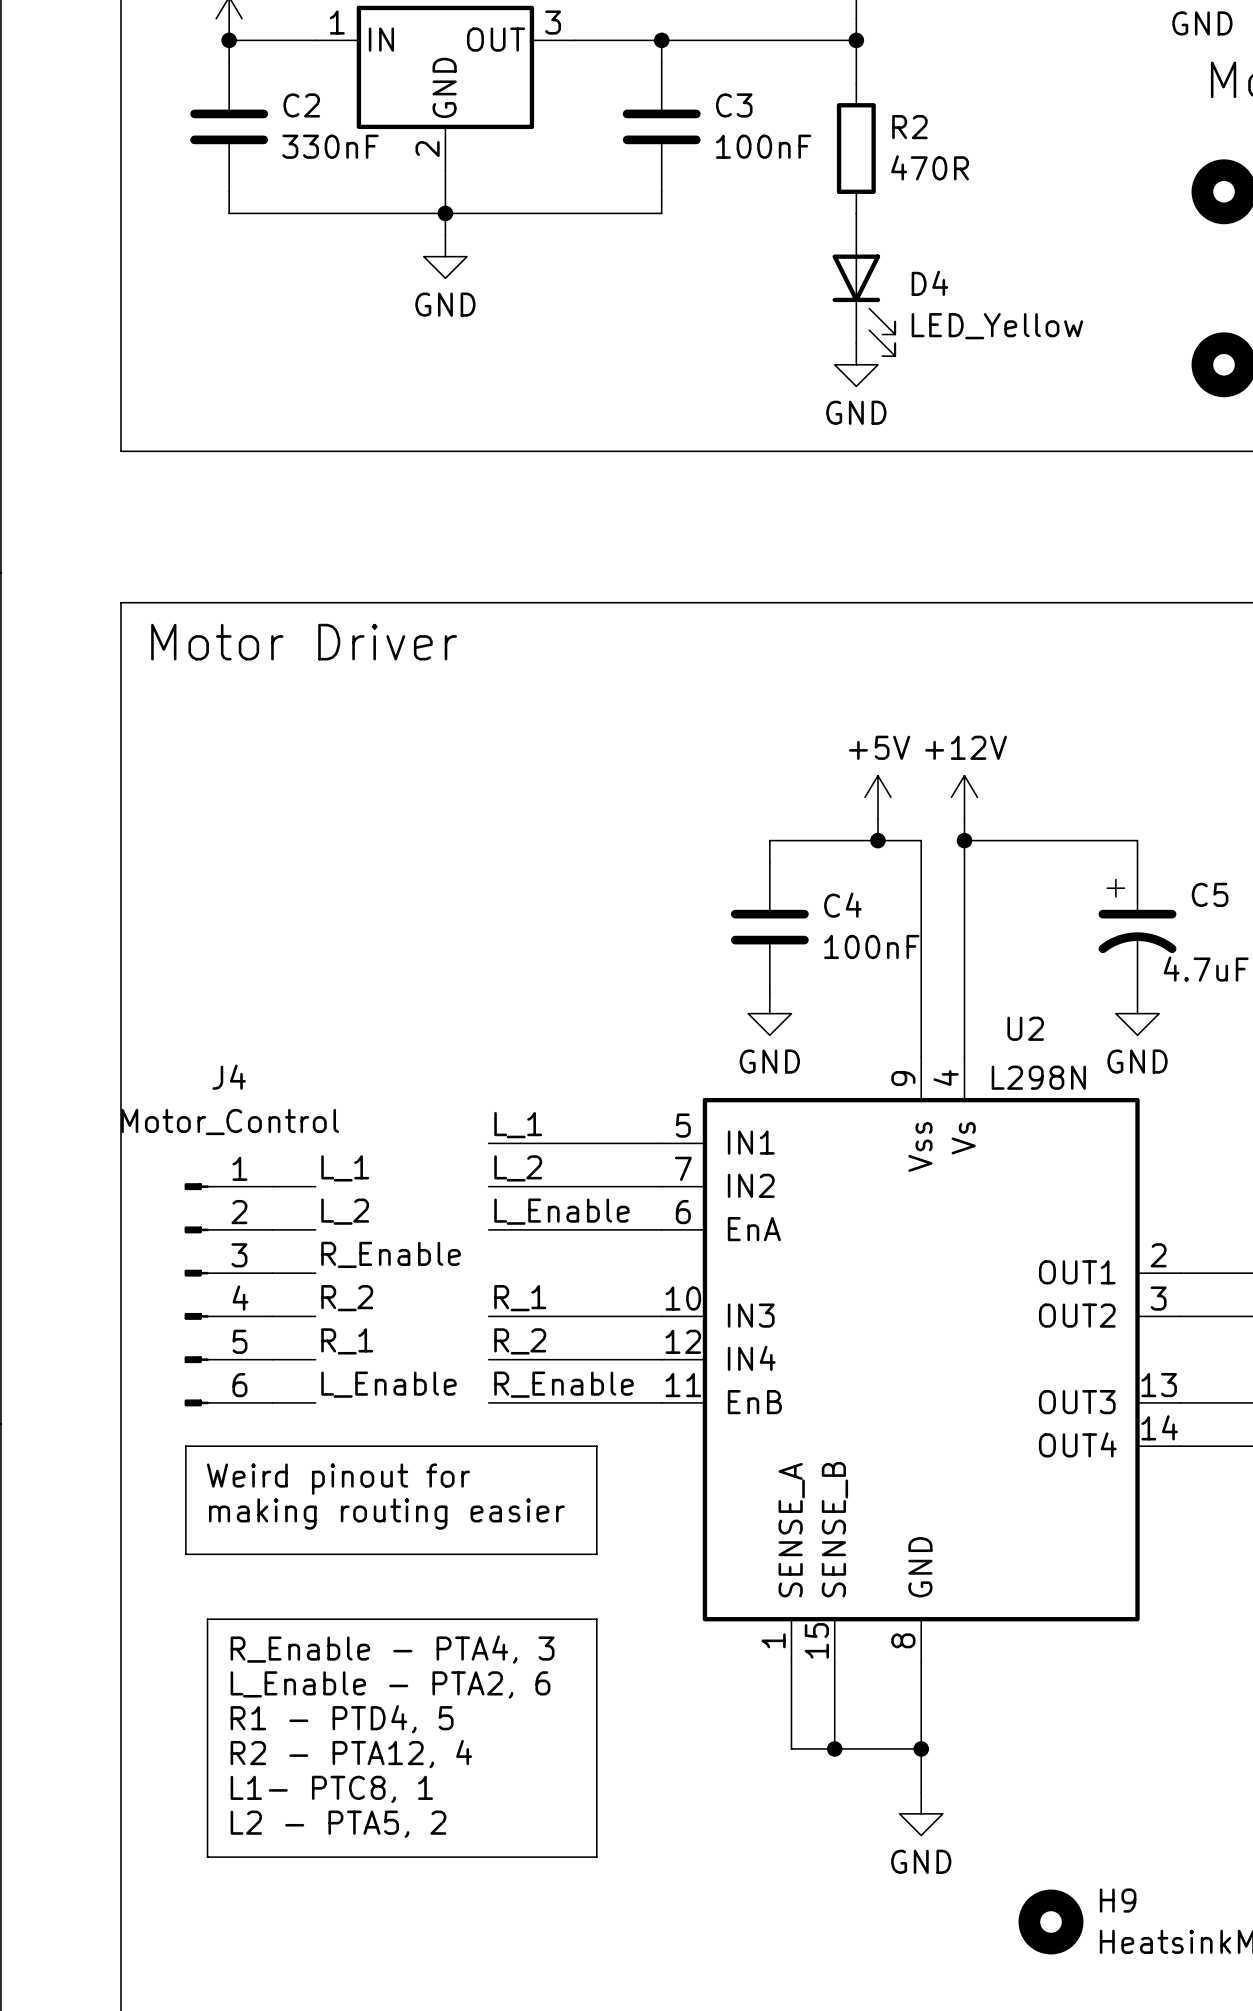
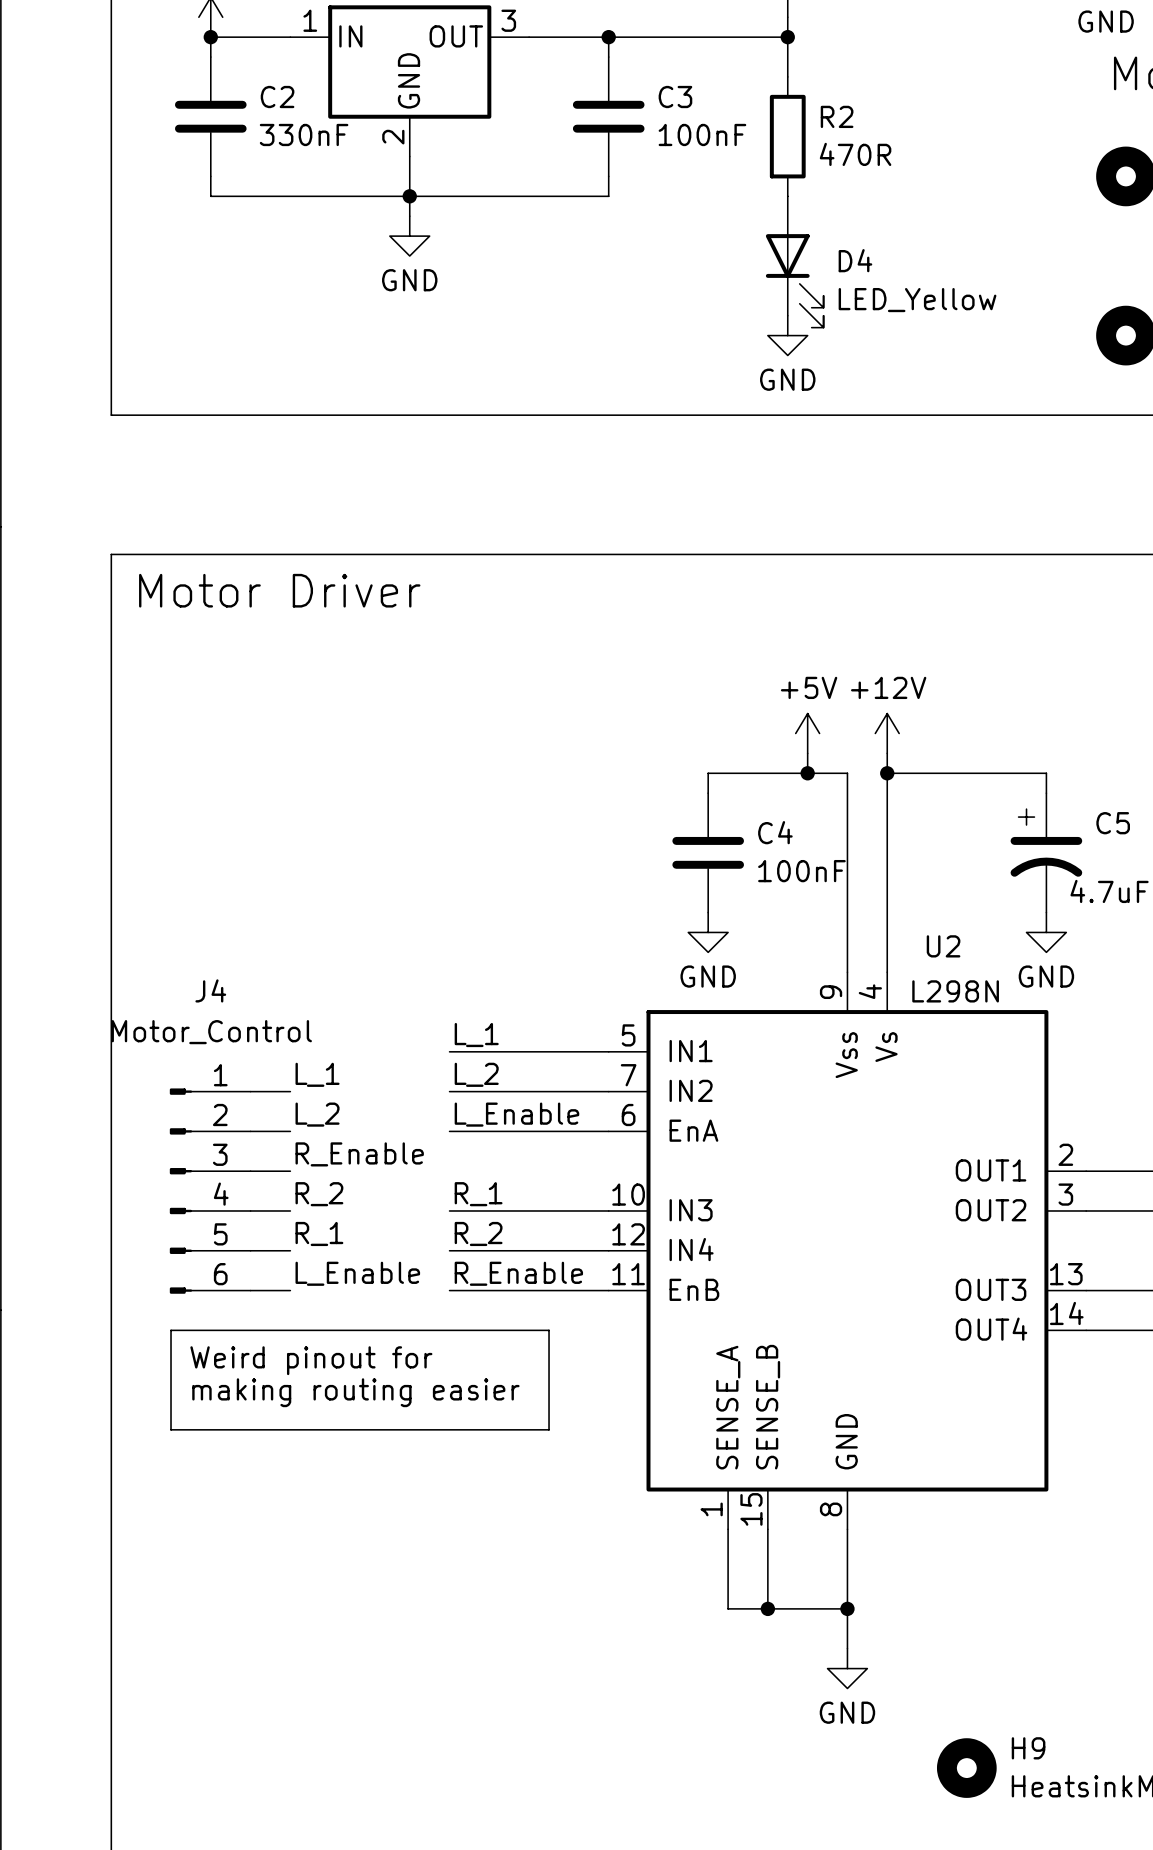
line: (207, 1619) (596, 1619) (596, 1857) (207, 1857) (207, 1619) -> none
text: R_Enable - PTA4, 3 (392, 1649) -> none
text: L_Enable - PTA2, 6 (390, 1684) -> none
text: R1 - PTD4, 5 (342, 1719) -> none
text: R2 - PTA12, 4 (351, 1754) -> none
text: L1- PTC8, 1 (331, 1789) -> none
text: L2 - PTA5, 2 (338, 1824) -> none

